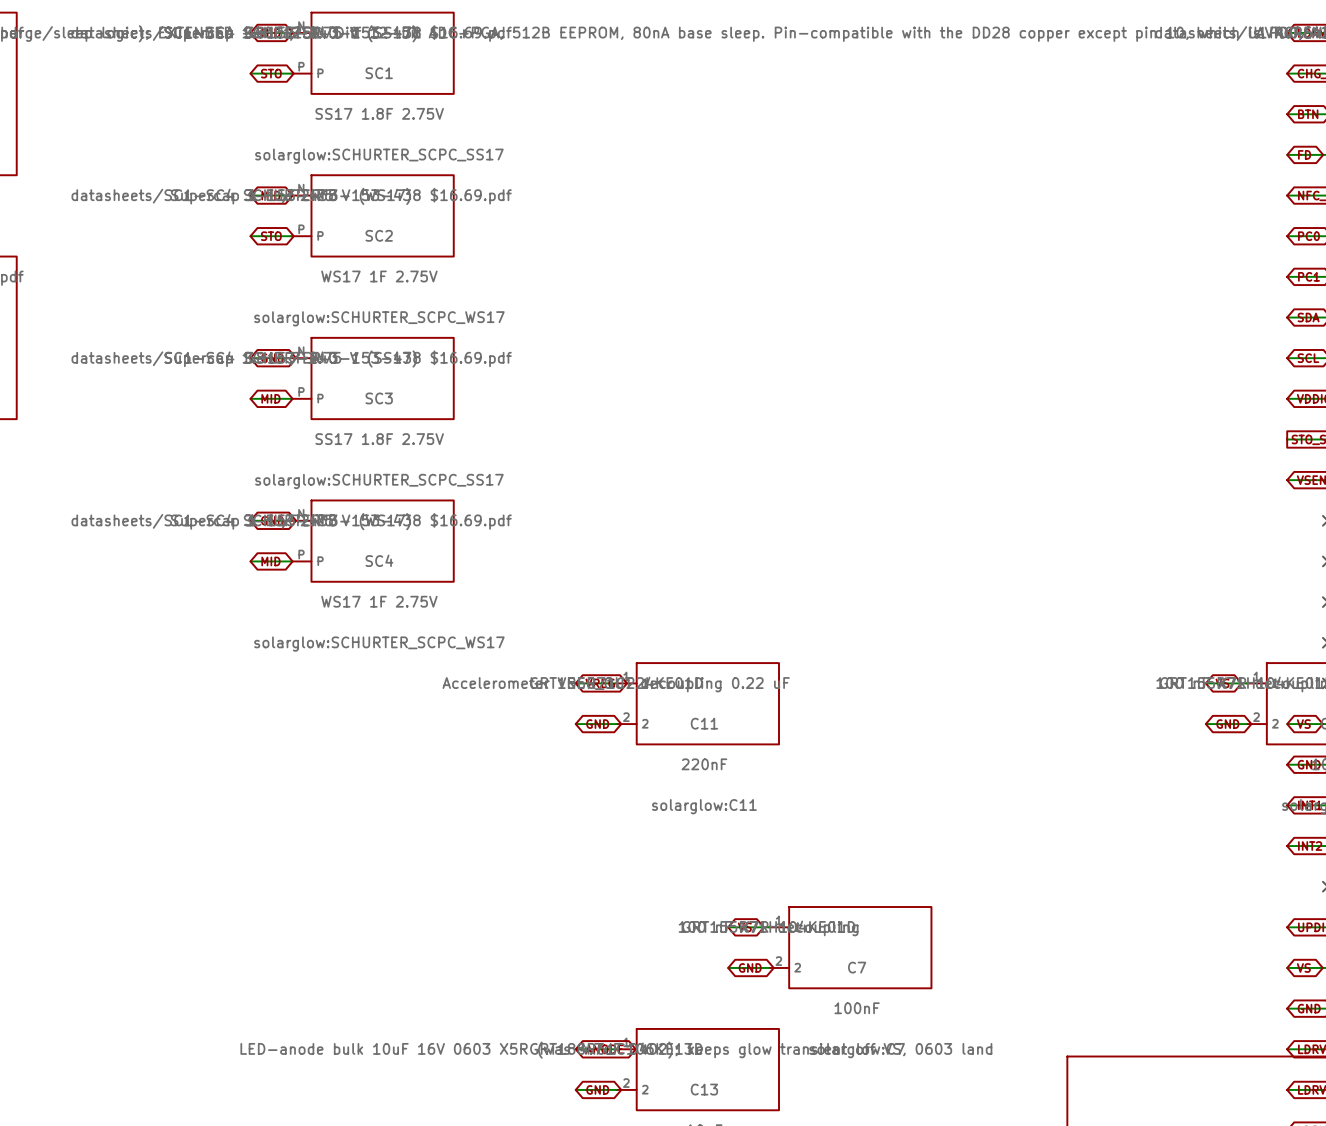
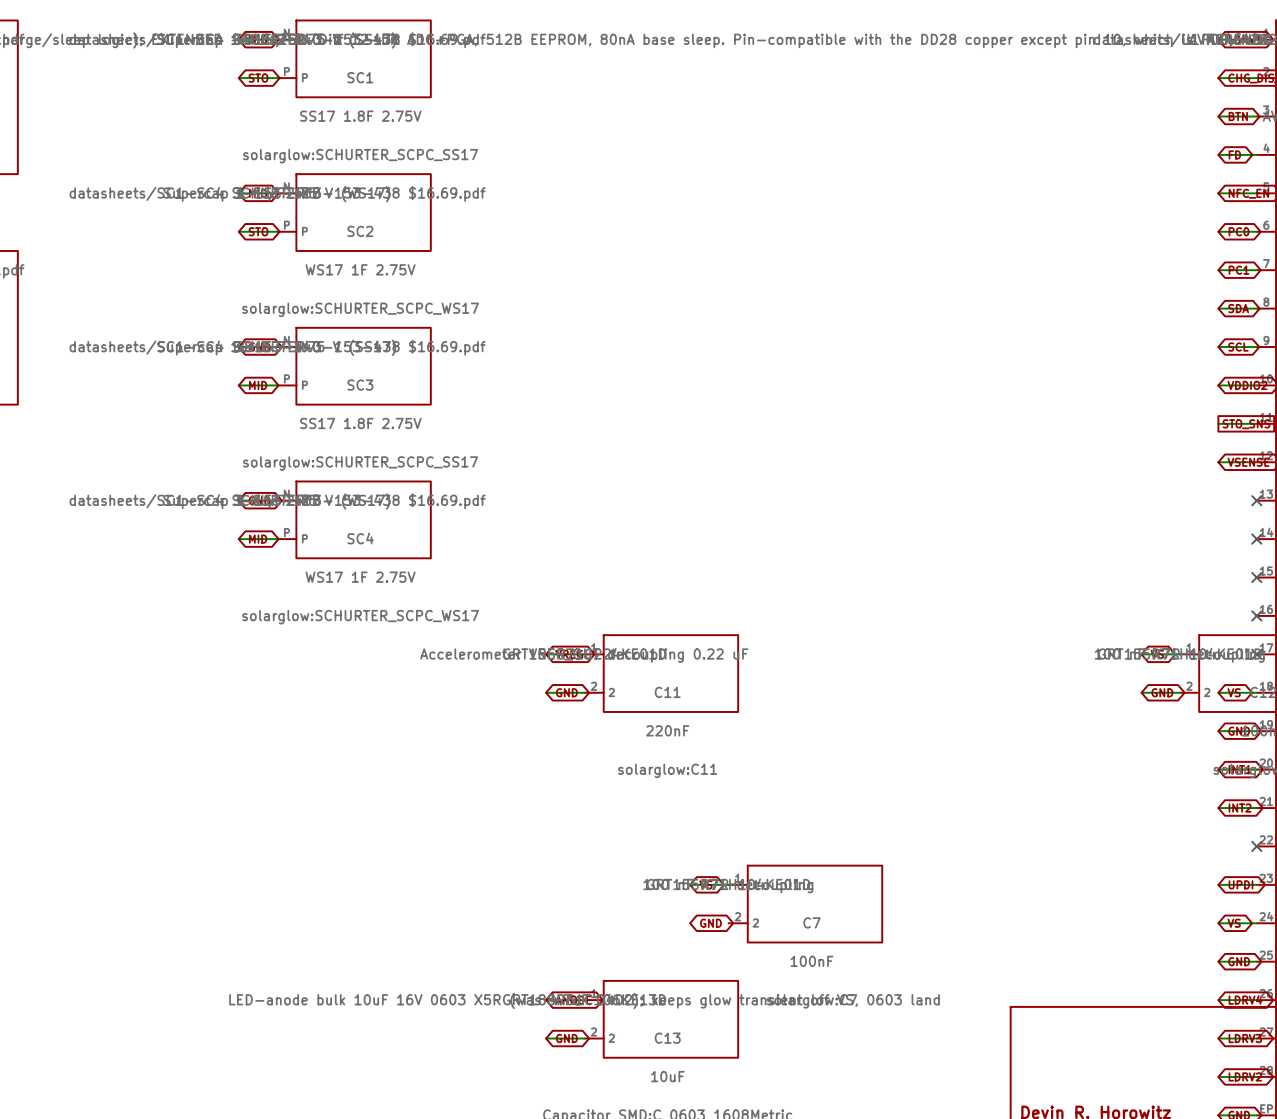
wire: (728, 967) (768, 967) -> none

